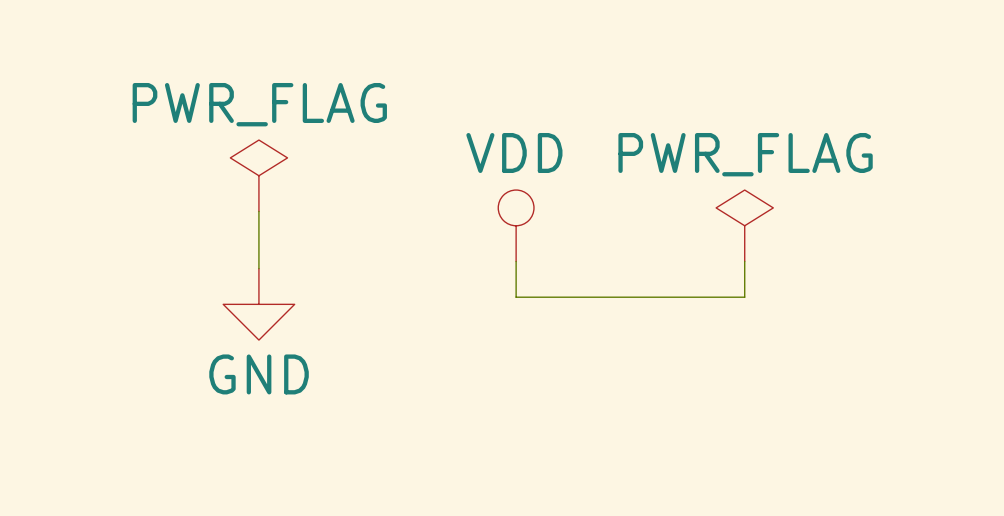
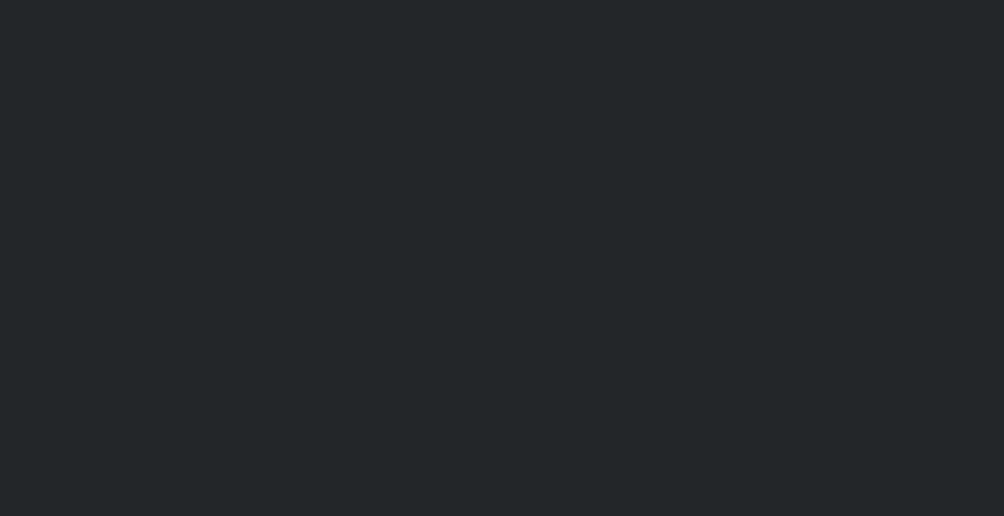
power symbol: PWR_FLAG (258, 175) -> none
wire: (258, 211) (258, 268) -> none
power symbol: VDD (516, 225) -> none
power symbol: PWR_FLAG (744, 225) -> none
wire: (516, 261) (516, 297) (744, 297) (744, 261) -> none
power symbol: GND (258, 304) -> none

